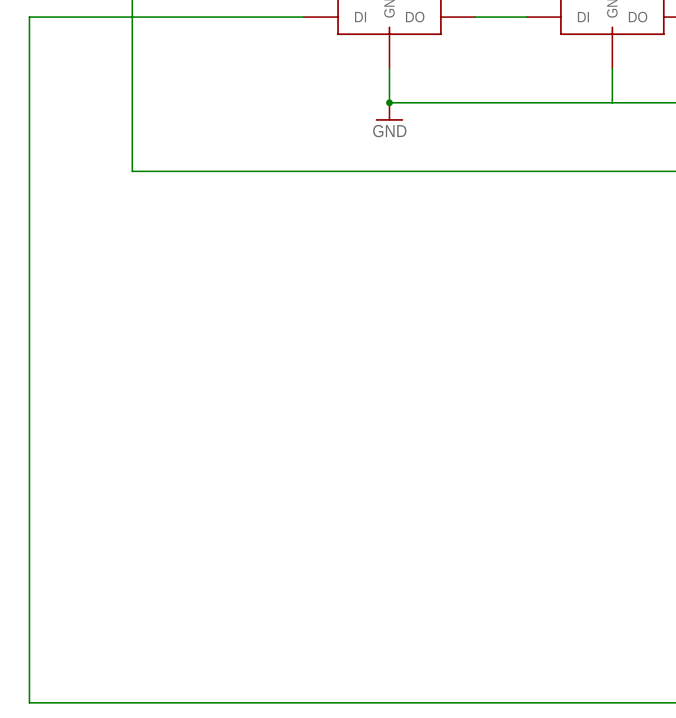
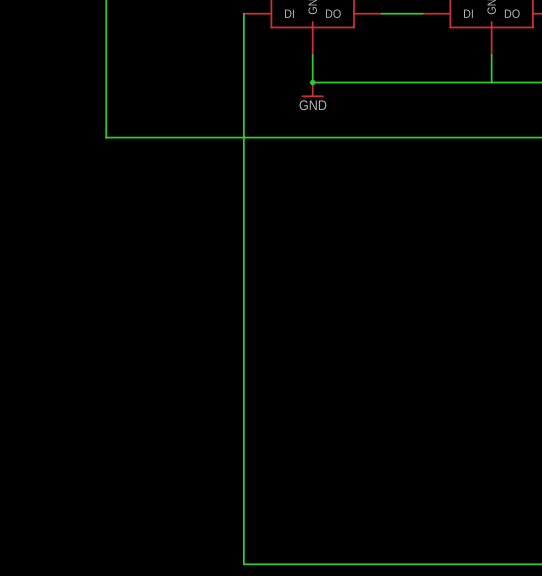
wire: (303, 17) (29, 17) (29, 702) (303, 702) -> (243, 13) (243, 564)

